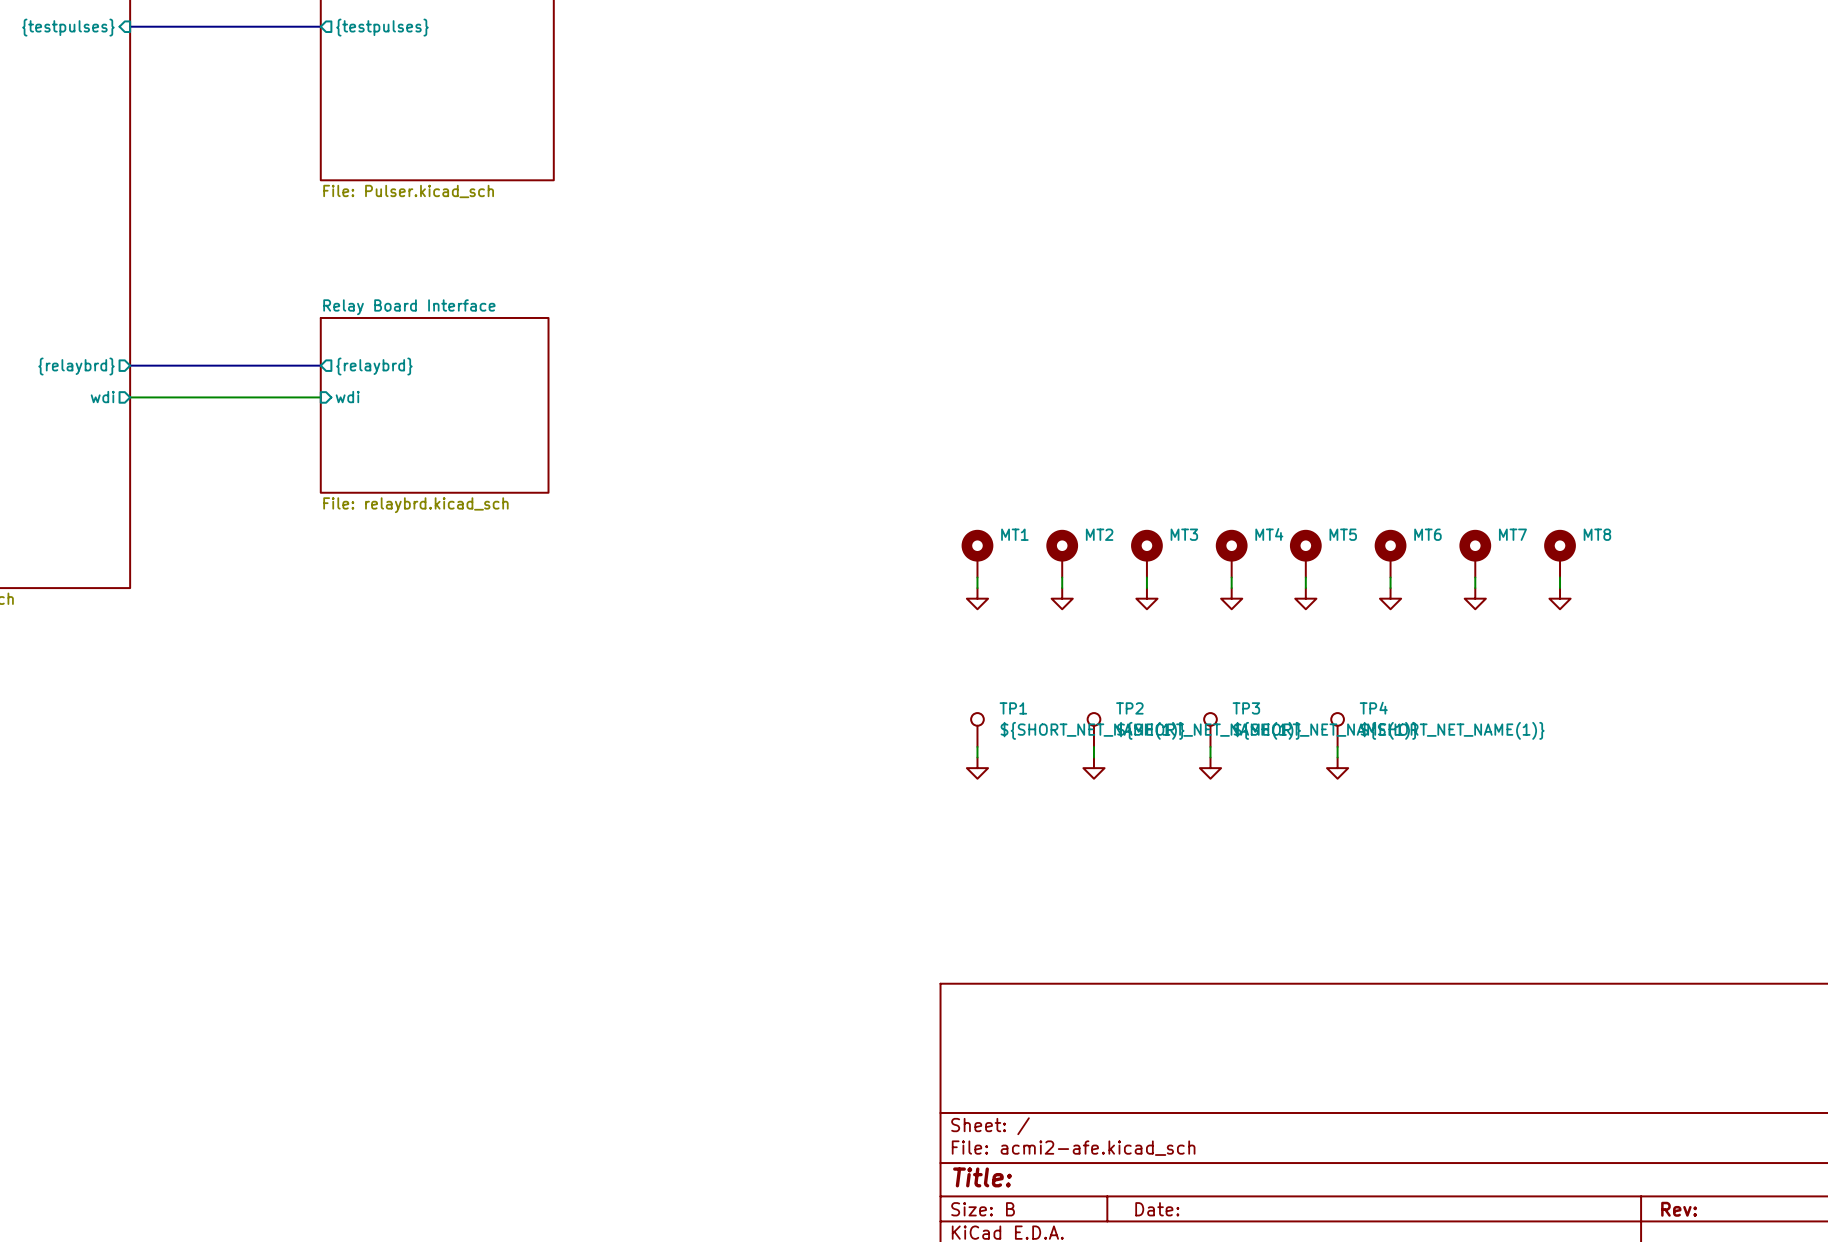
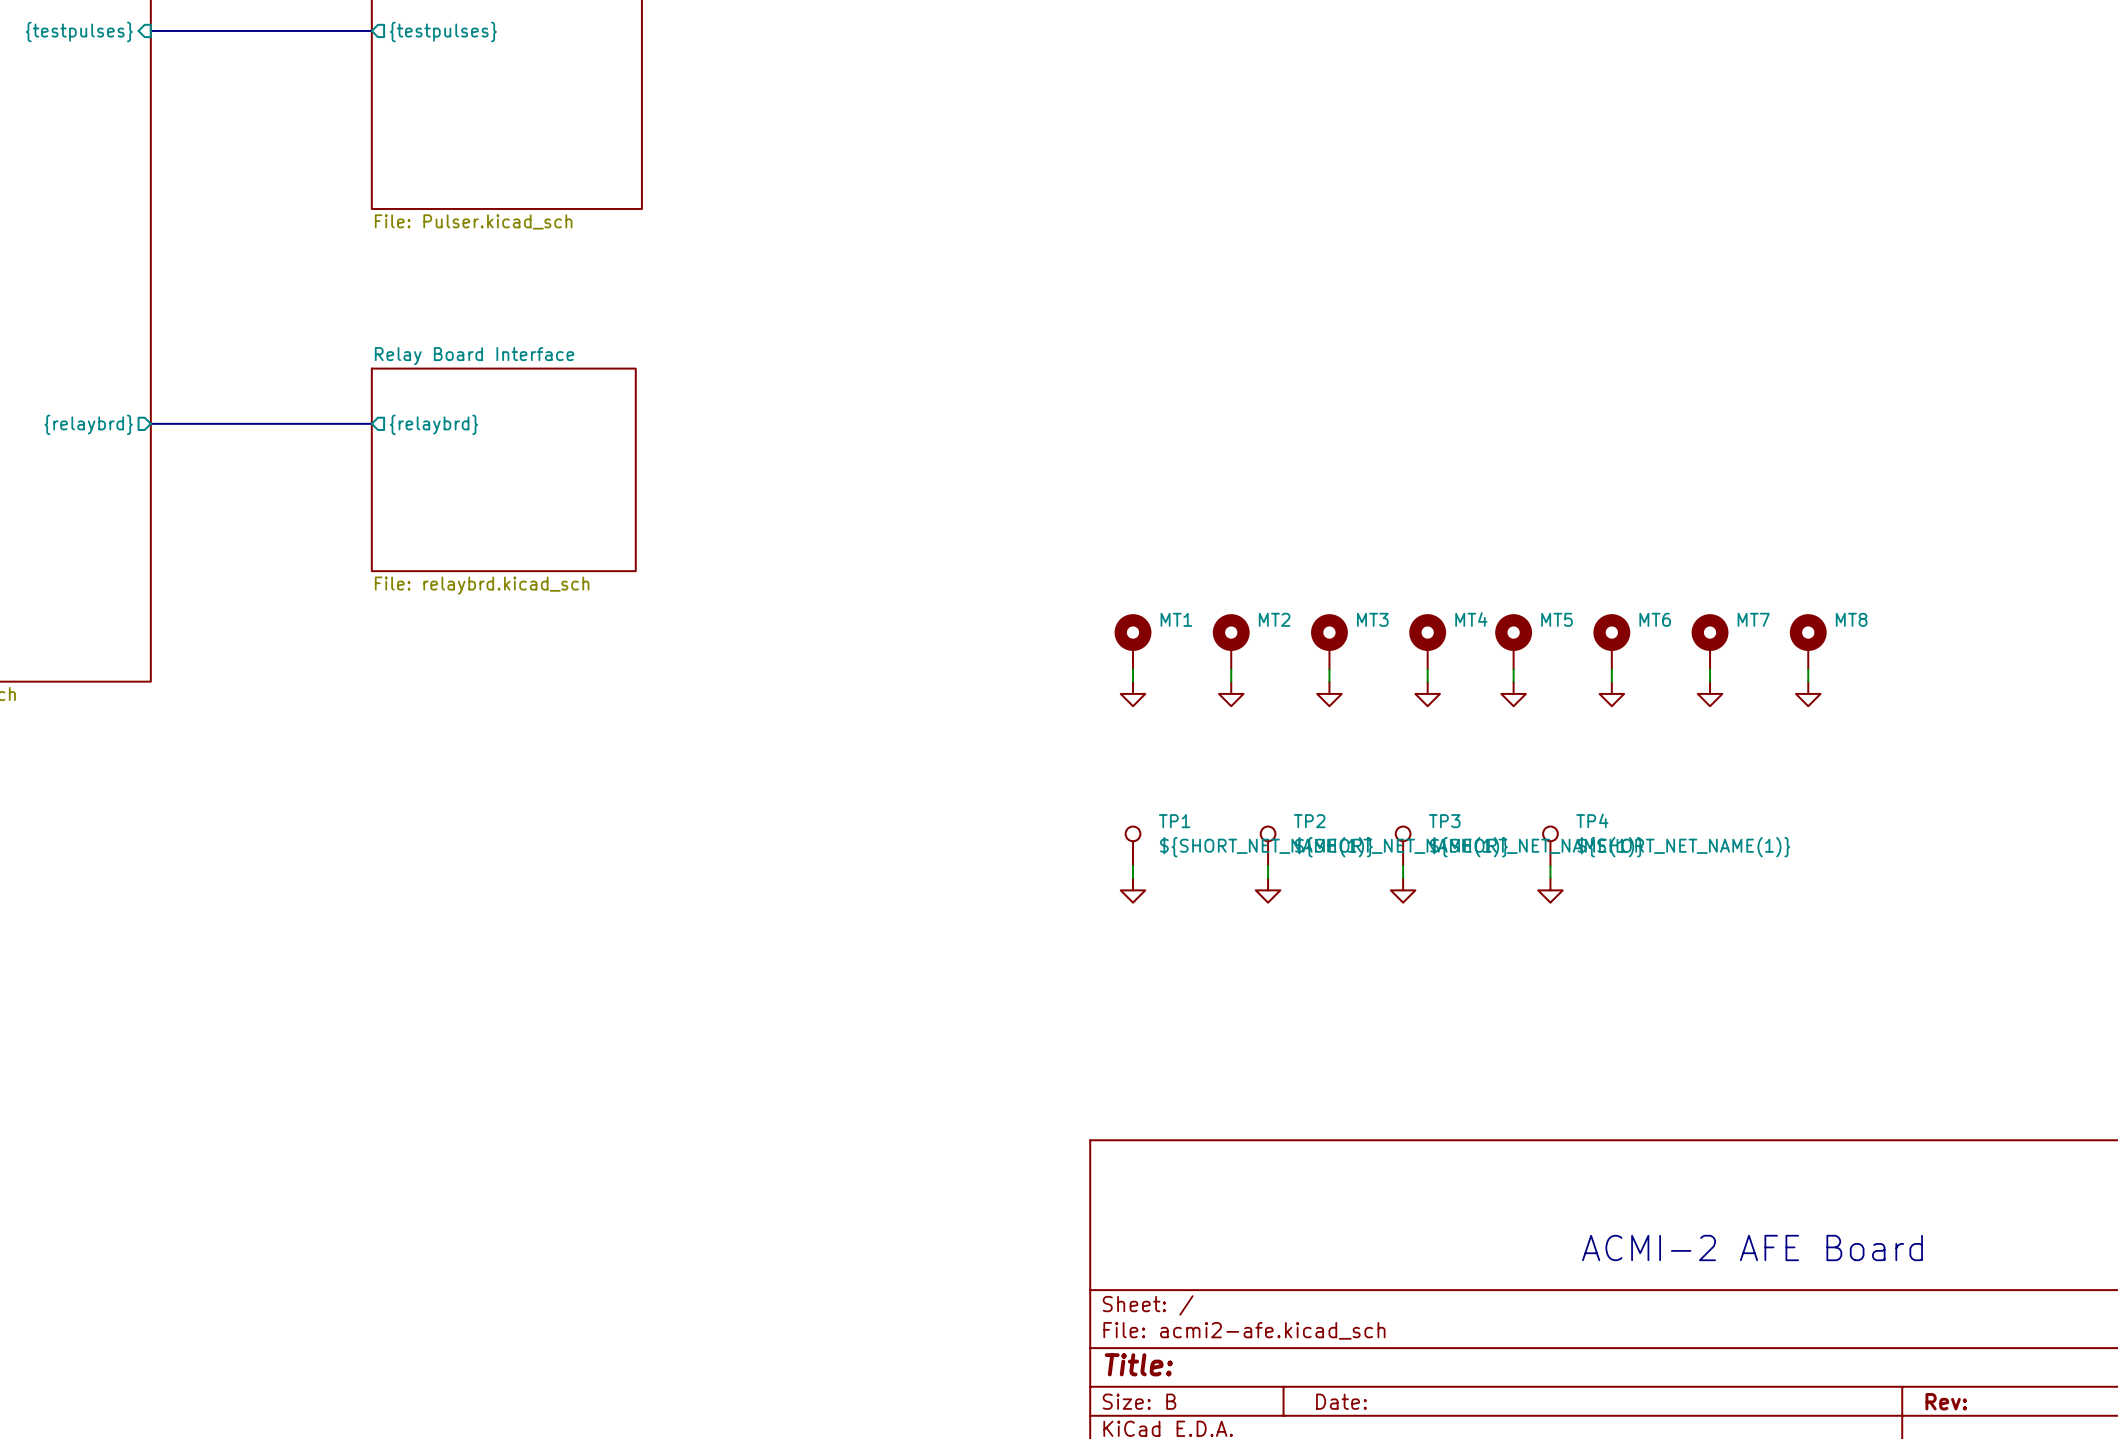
sheet pin: wdi (102, 397) -> none
wire: (130, 397) (320, 397) -> none
sheet pin: wdi (347, 397) -> none
text: none -> ACMI-2 AFE Board (1752, 1247)

